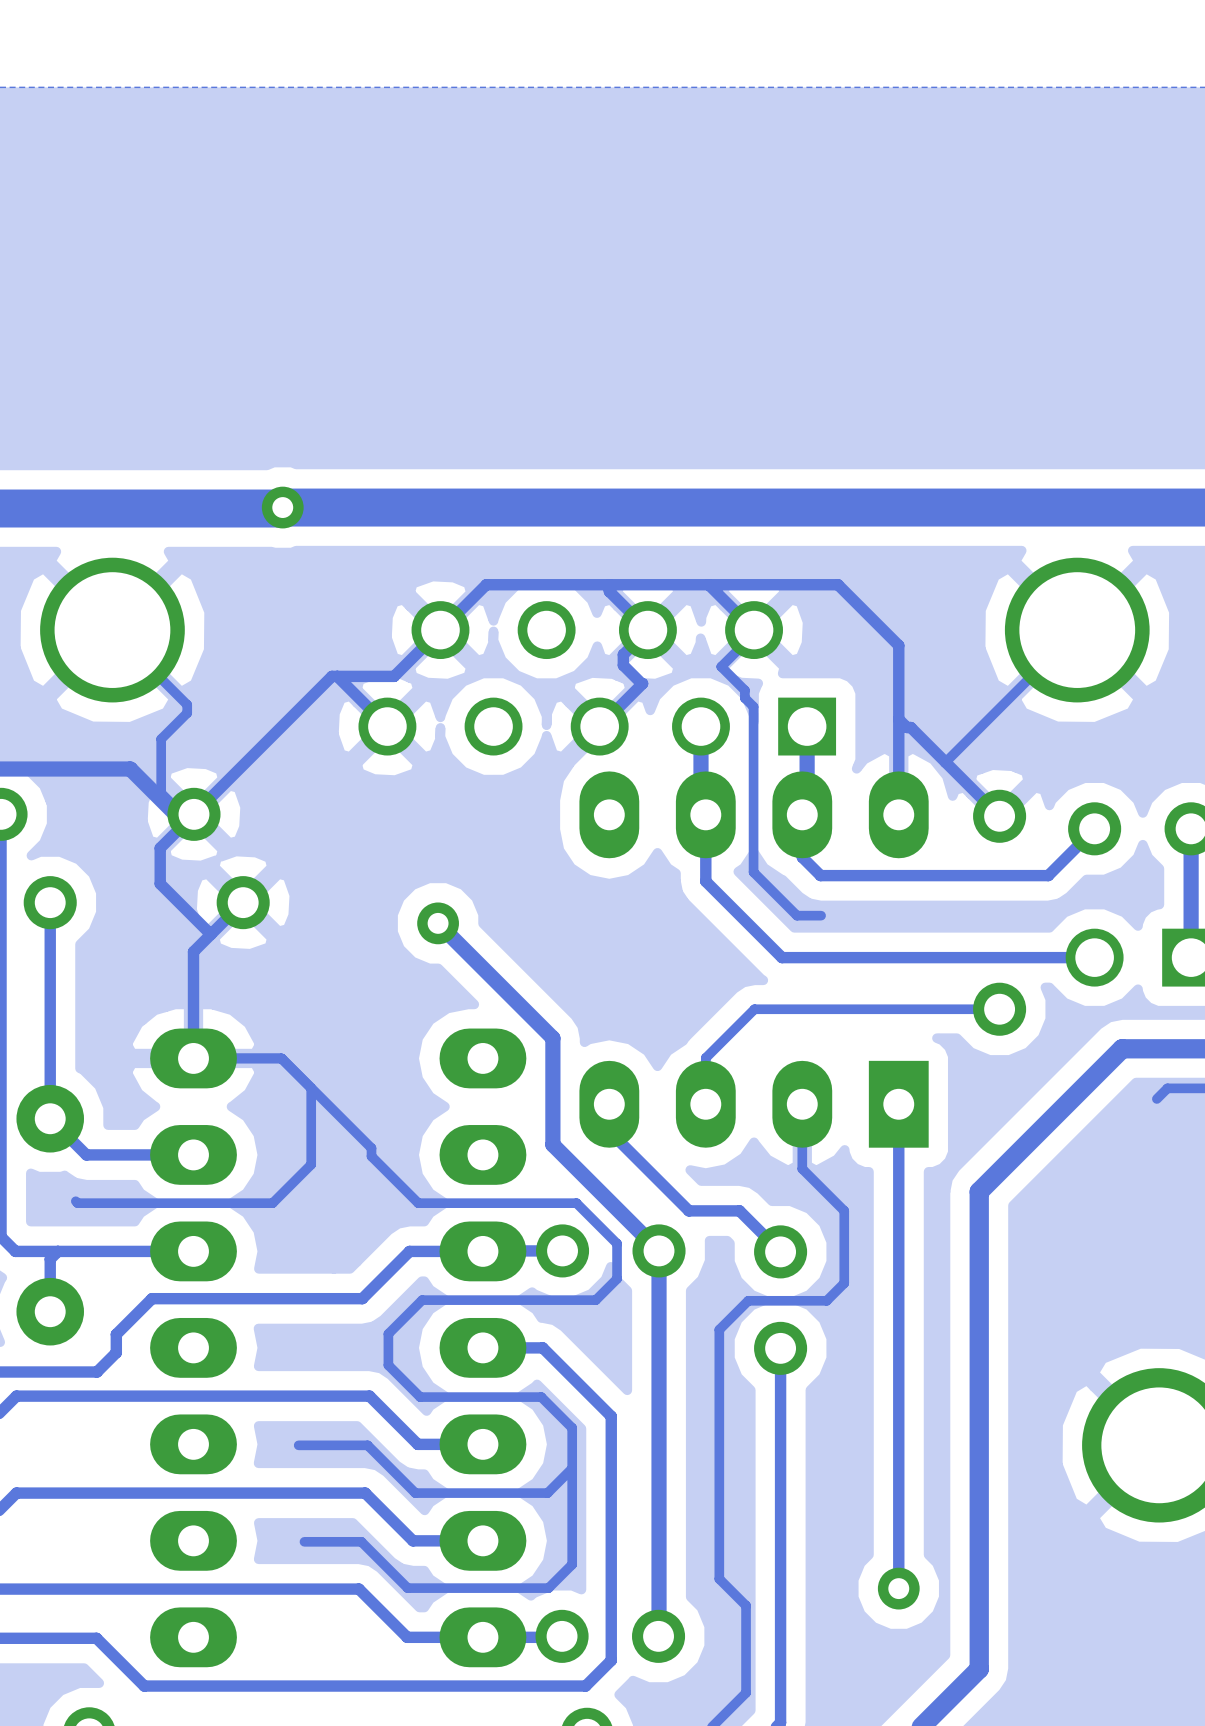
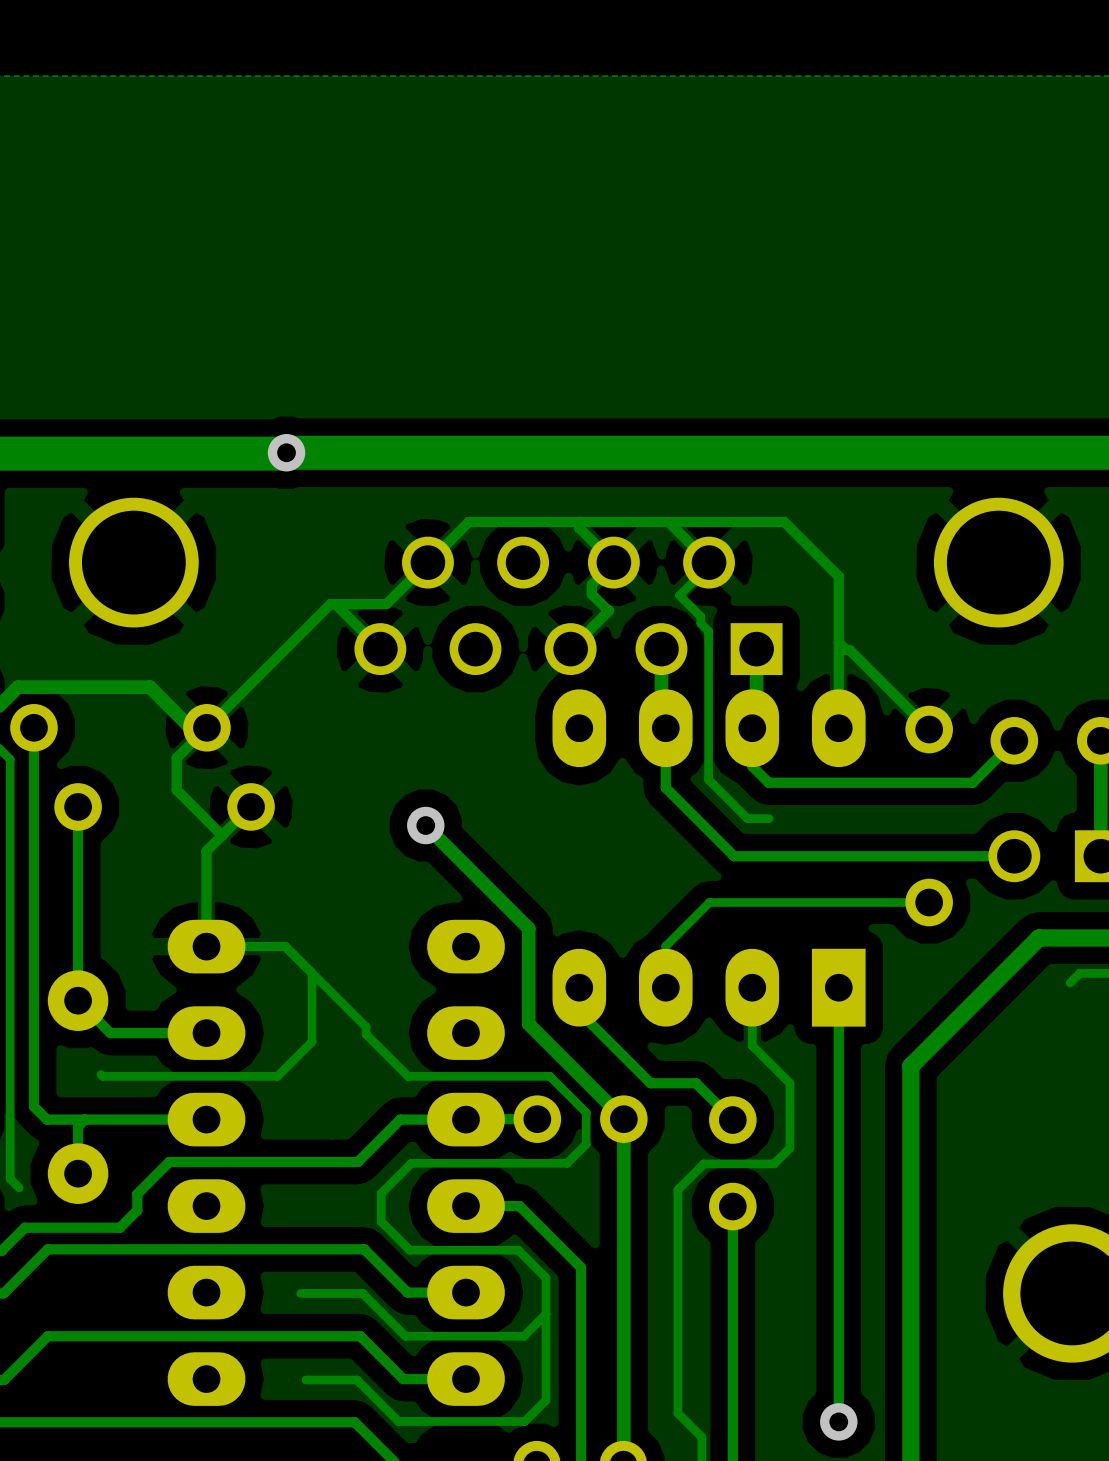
track: (112, 630) (187, 704) (187, 713) (161, 739) (161, 793) (182, 814) (193, 814) -> none
track: (1077, 630) (945, 762) -> none

